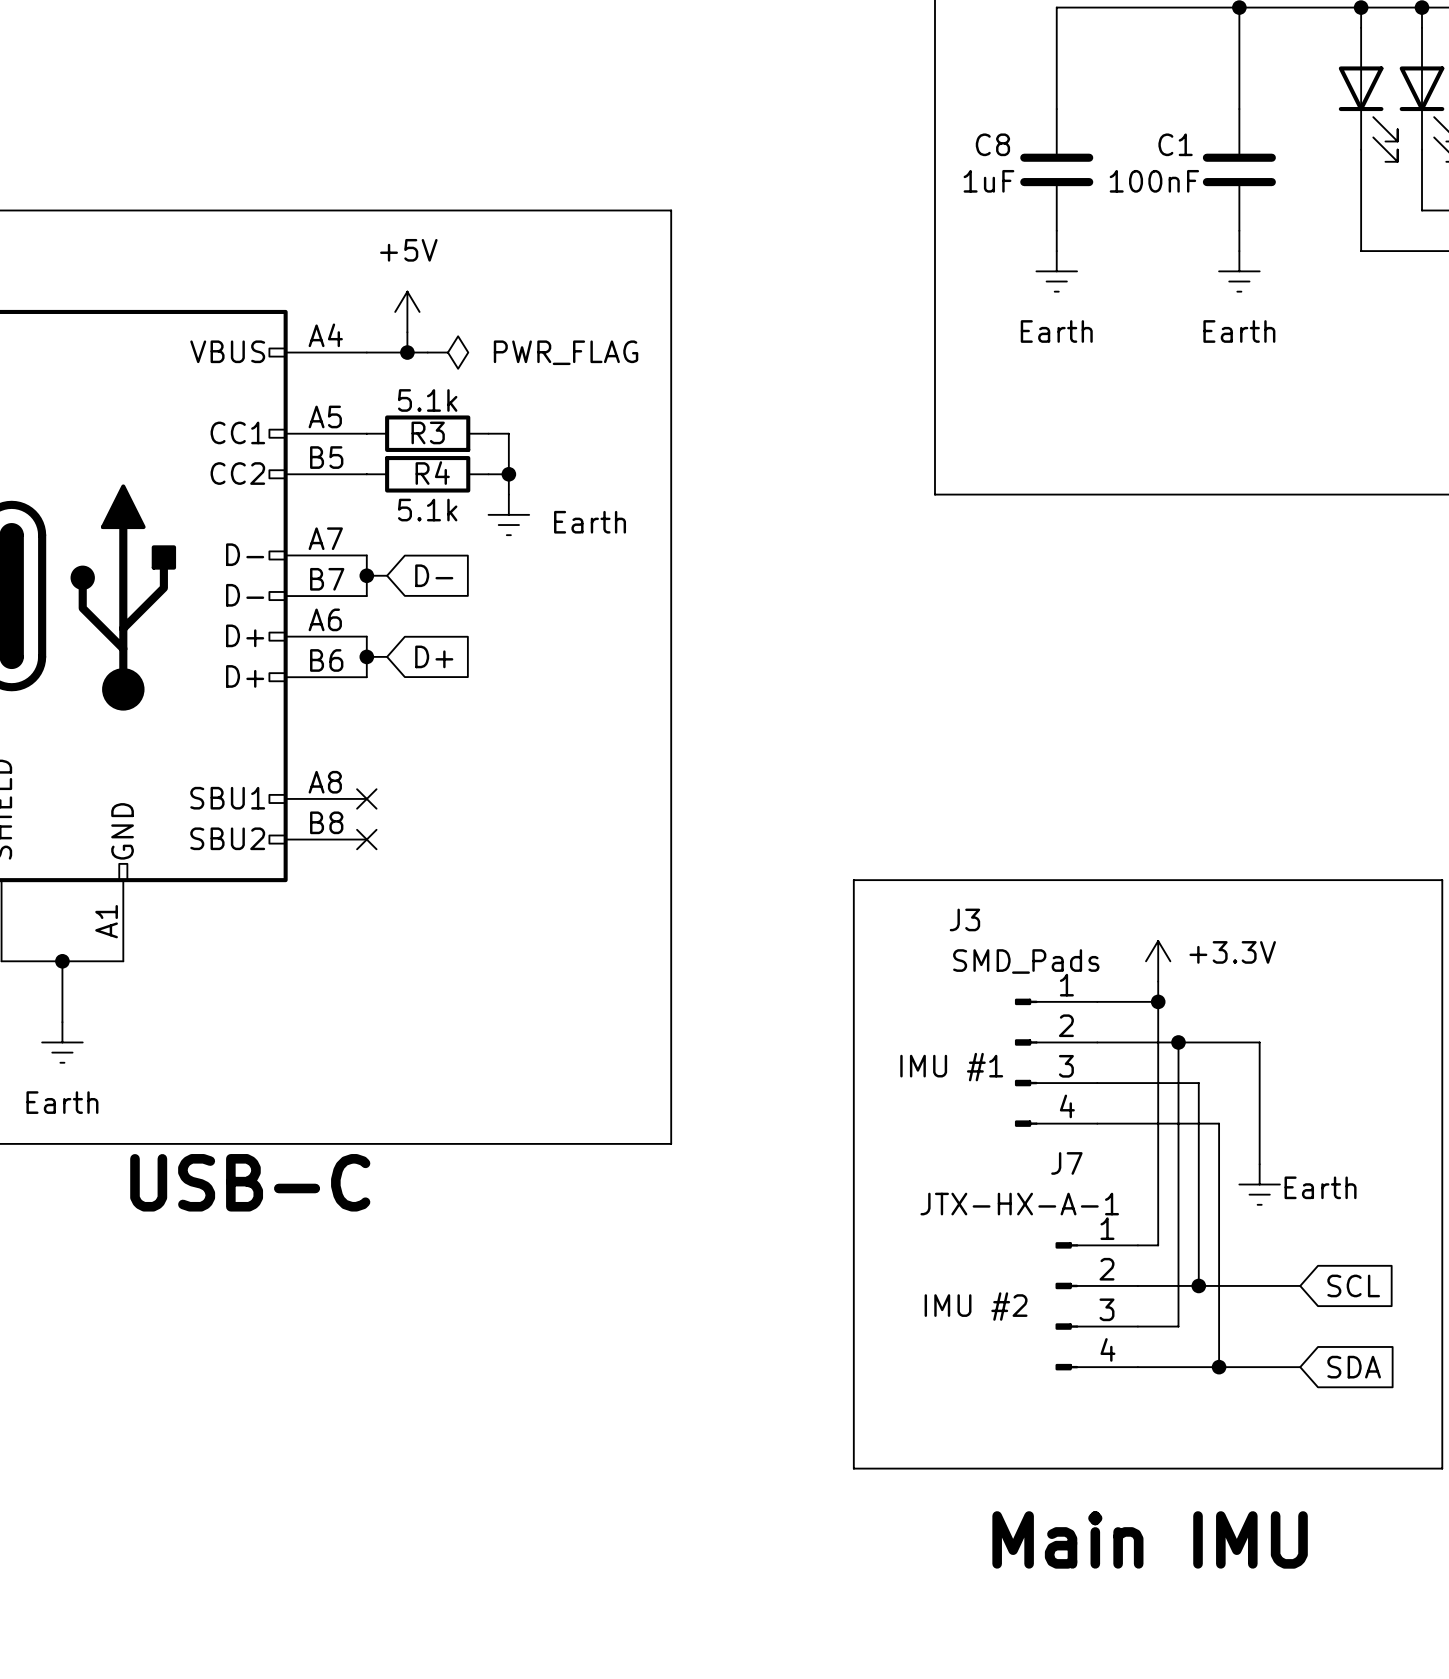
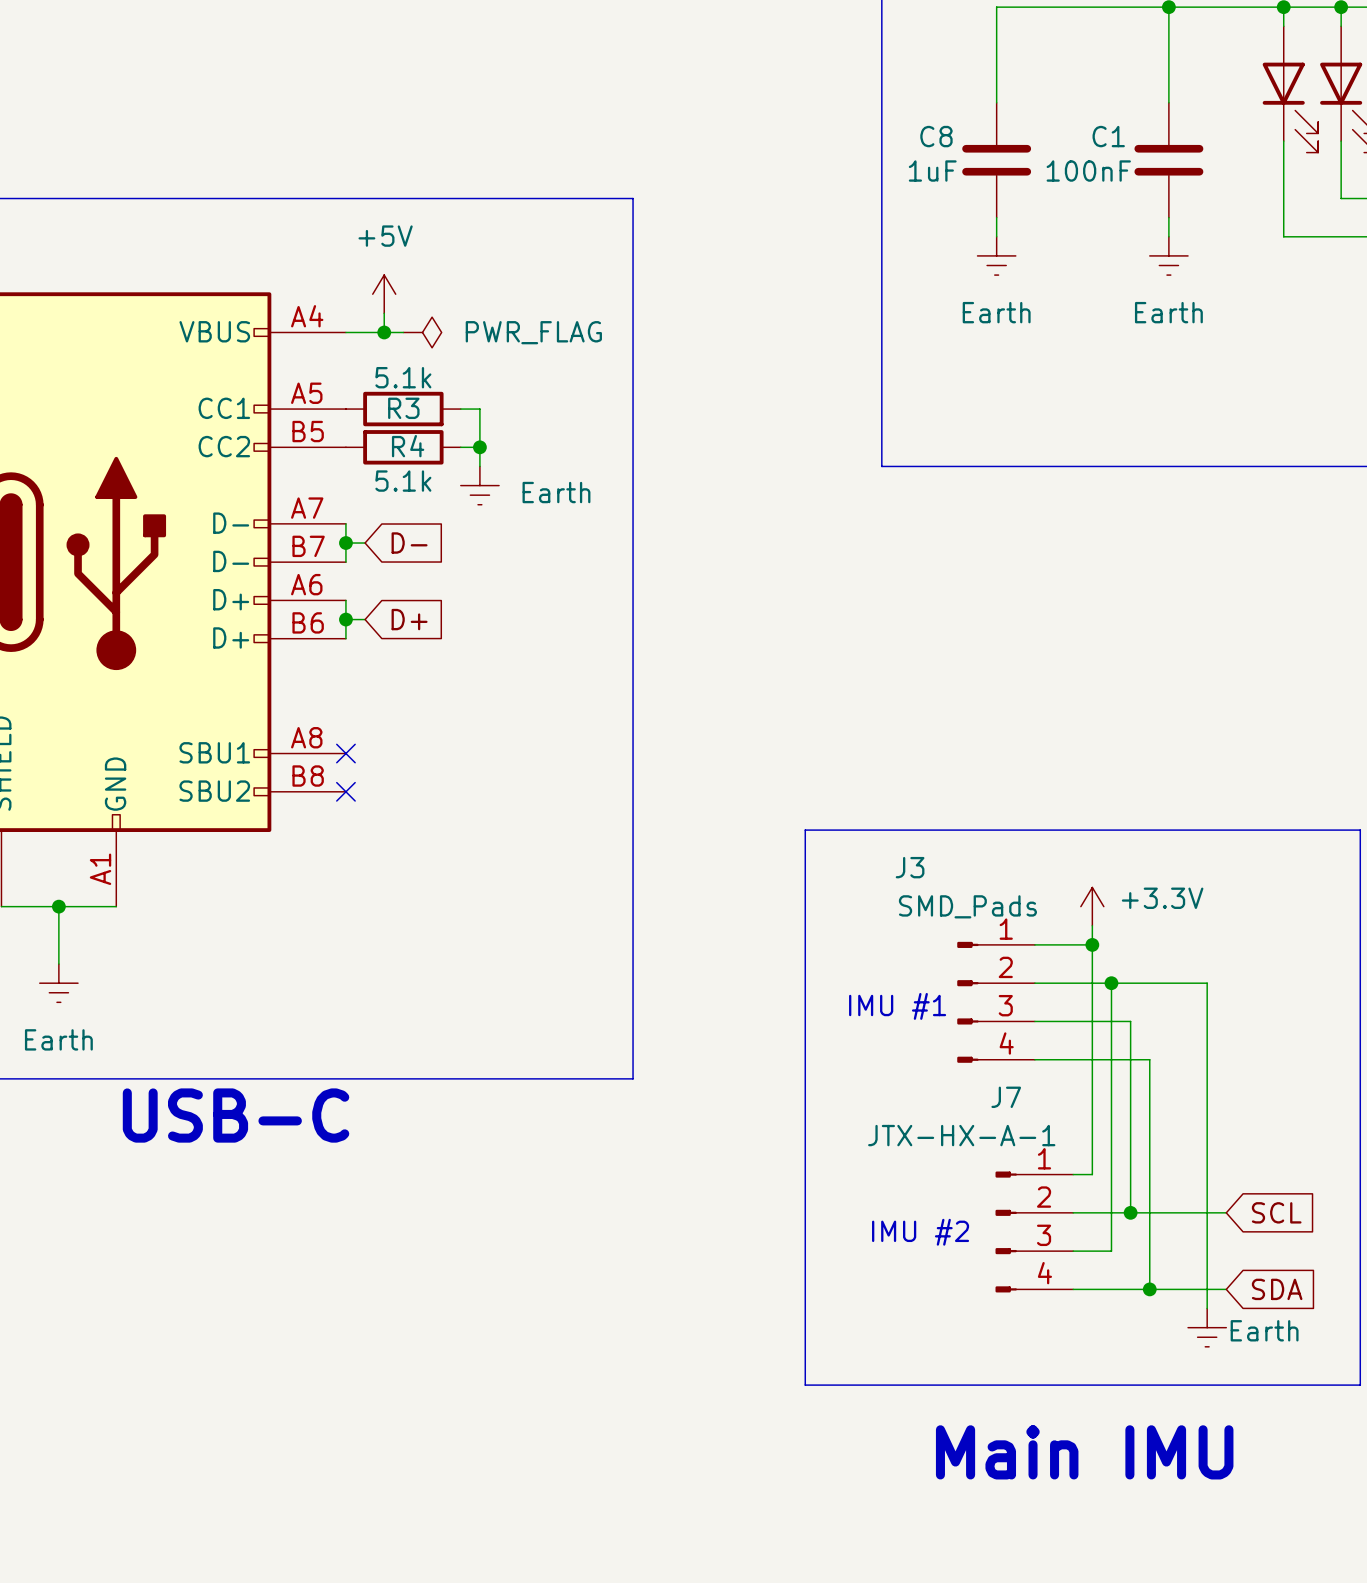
wire: (1259, 1042) (1259, 1164) -> (1188, 983) (1207, 983) (1207, 1308)
power symbol position: Earth (1259, 1184) -> Earth (1207, 1327)

